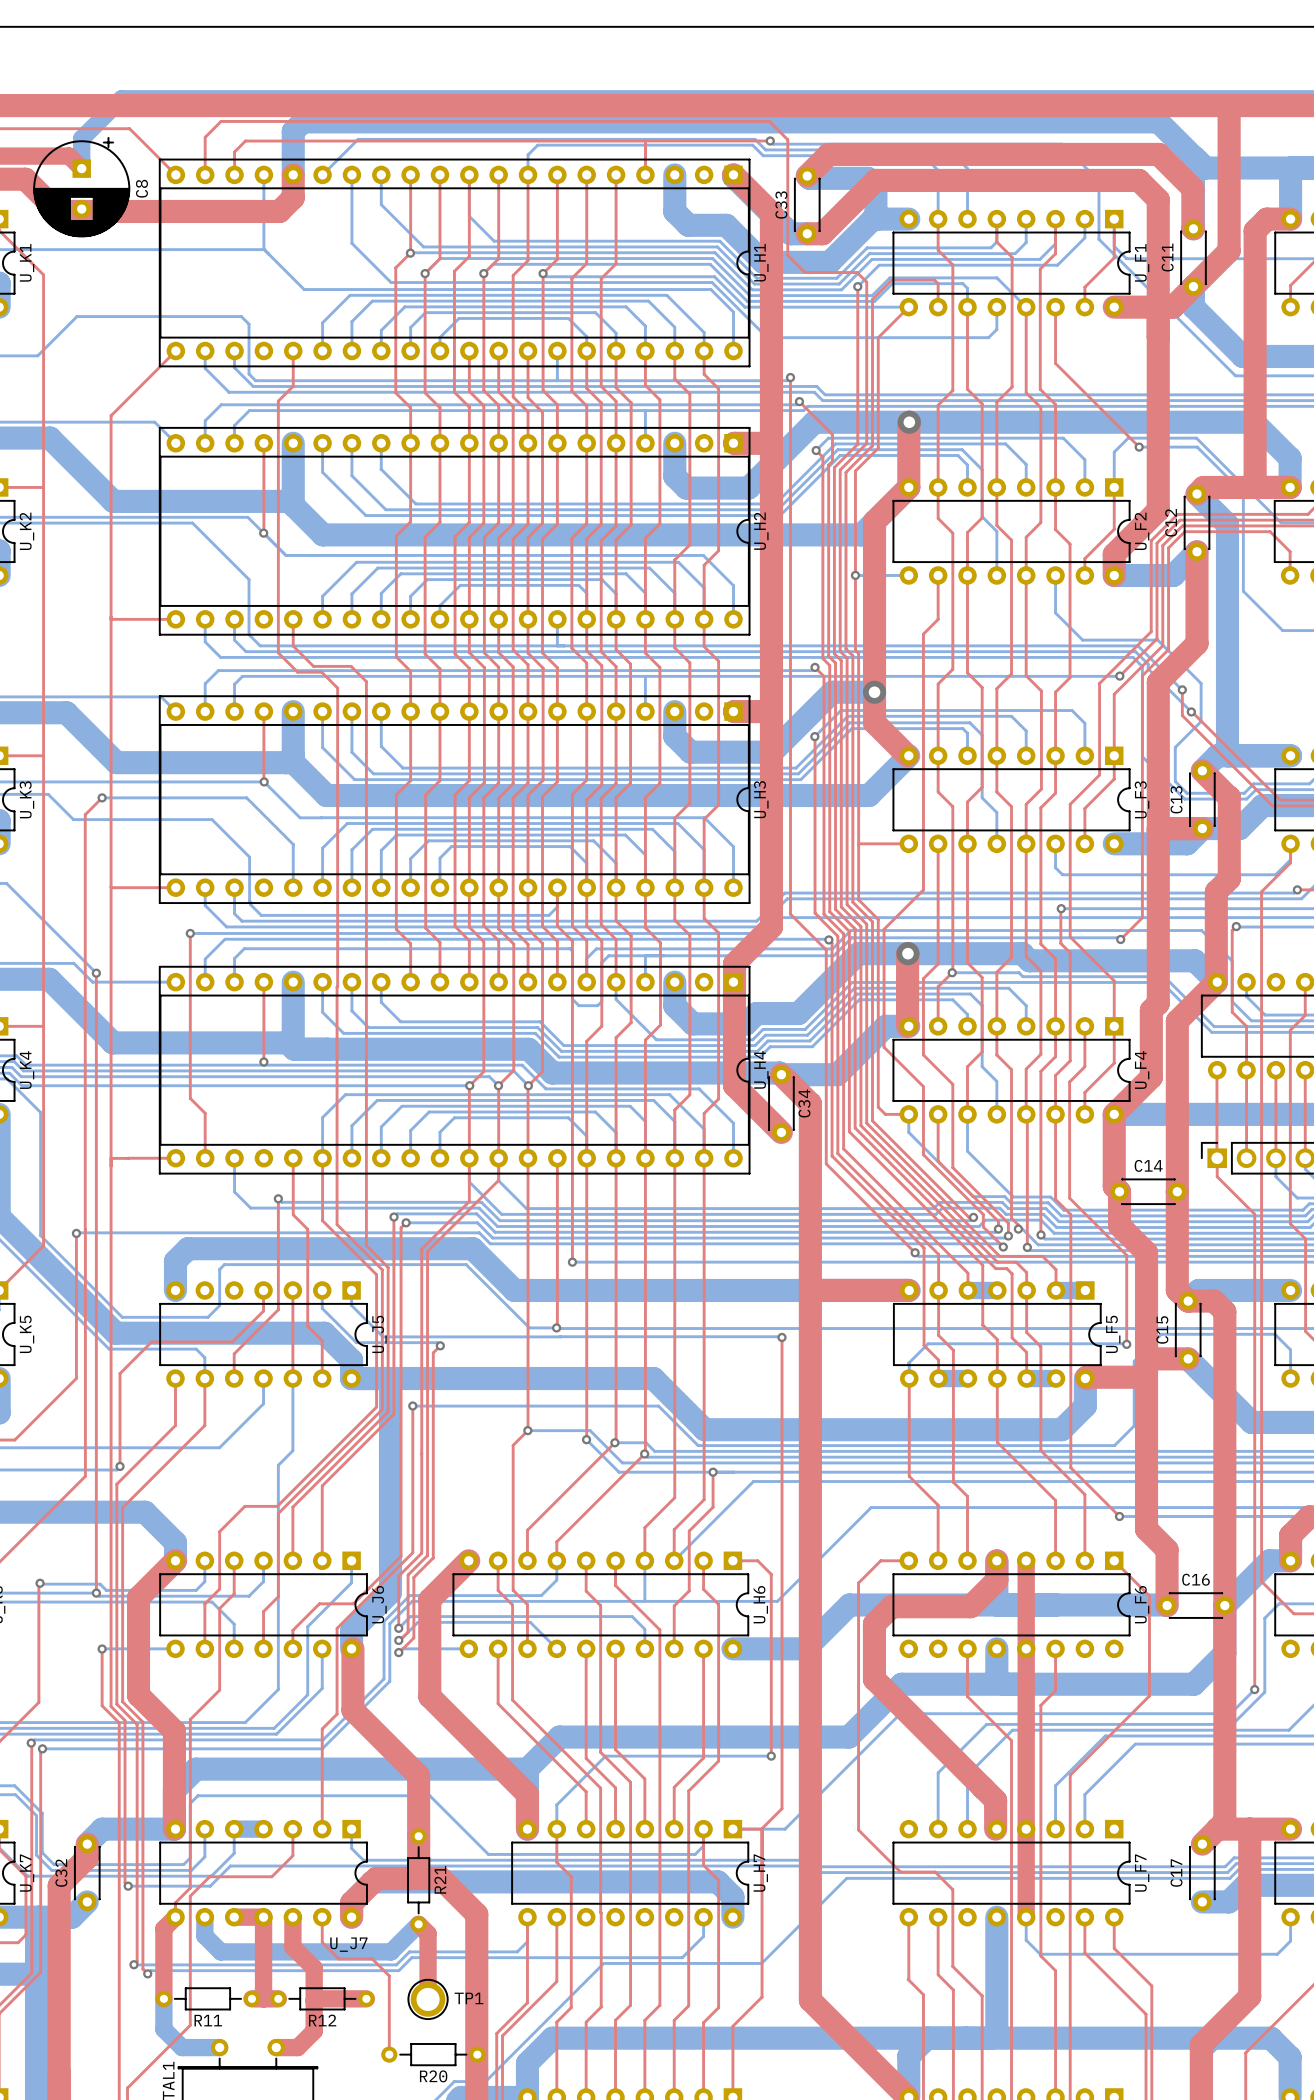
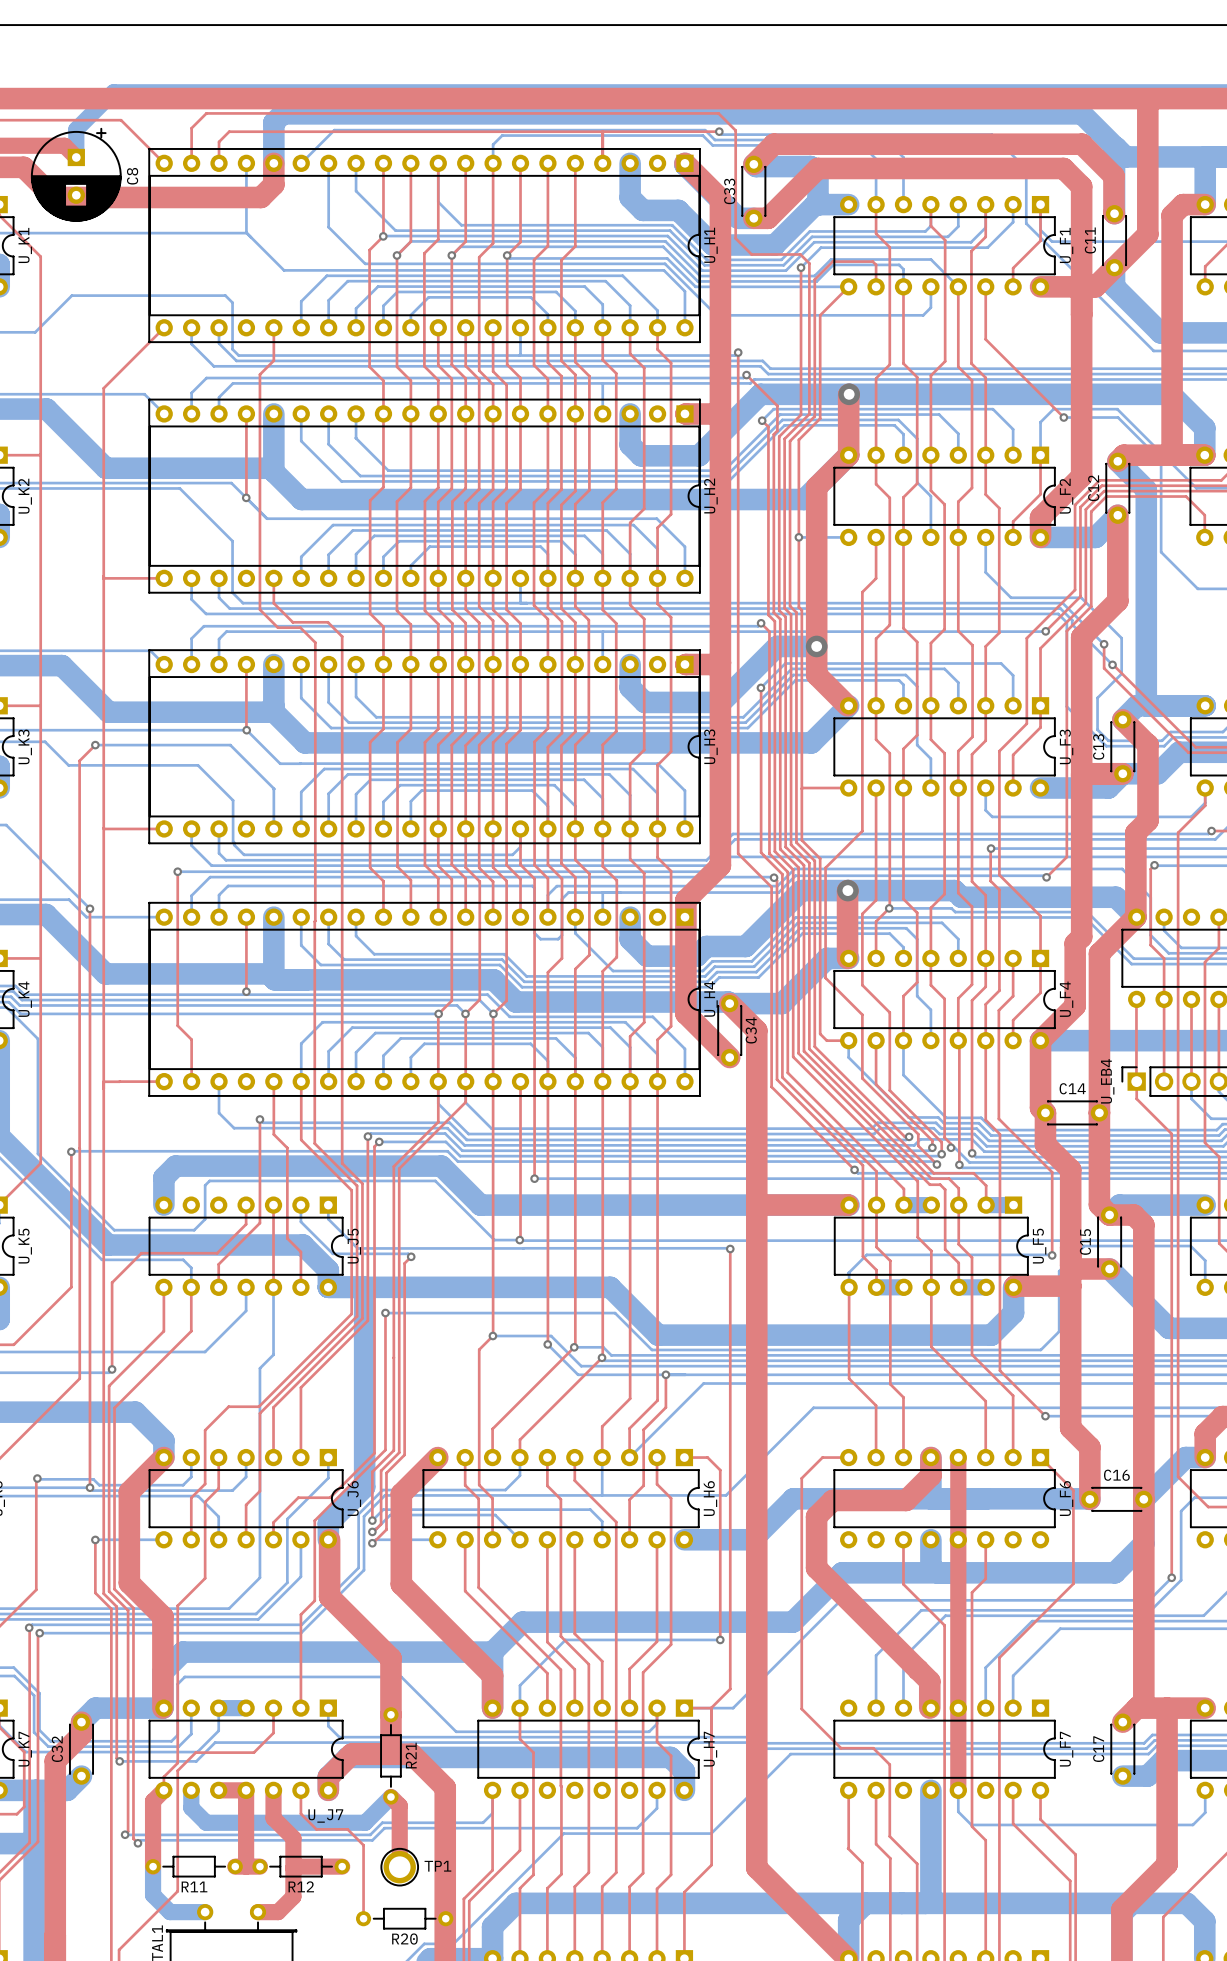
U_EB4 name: none -> U_EB4 (1107, 1081)

